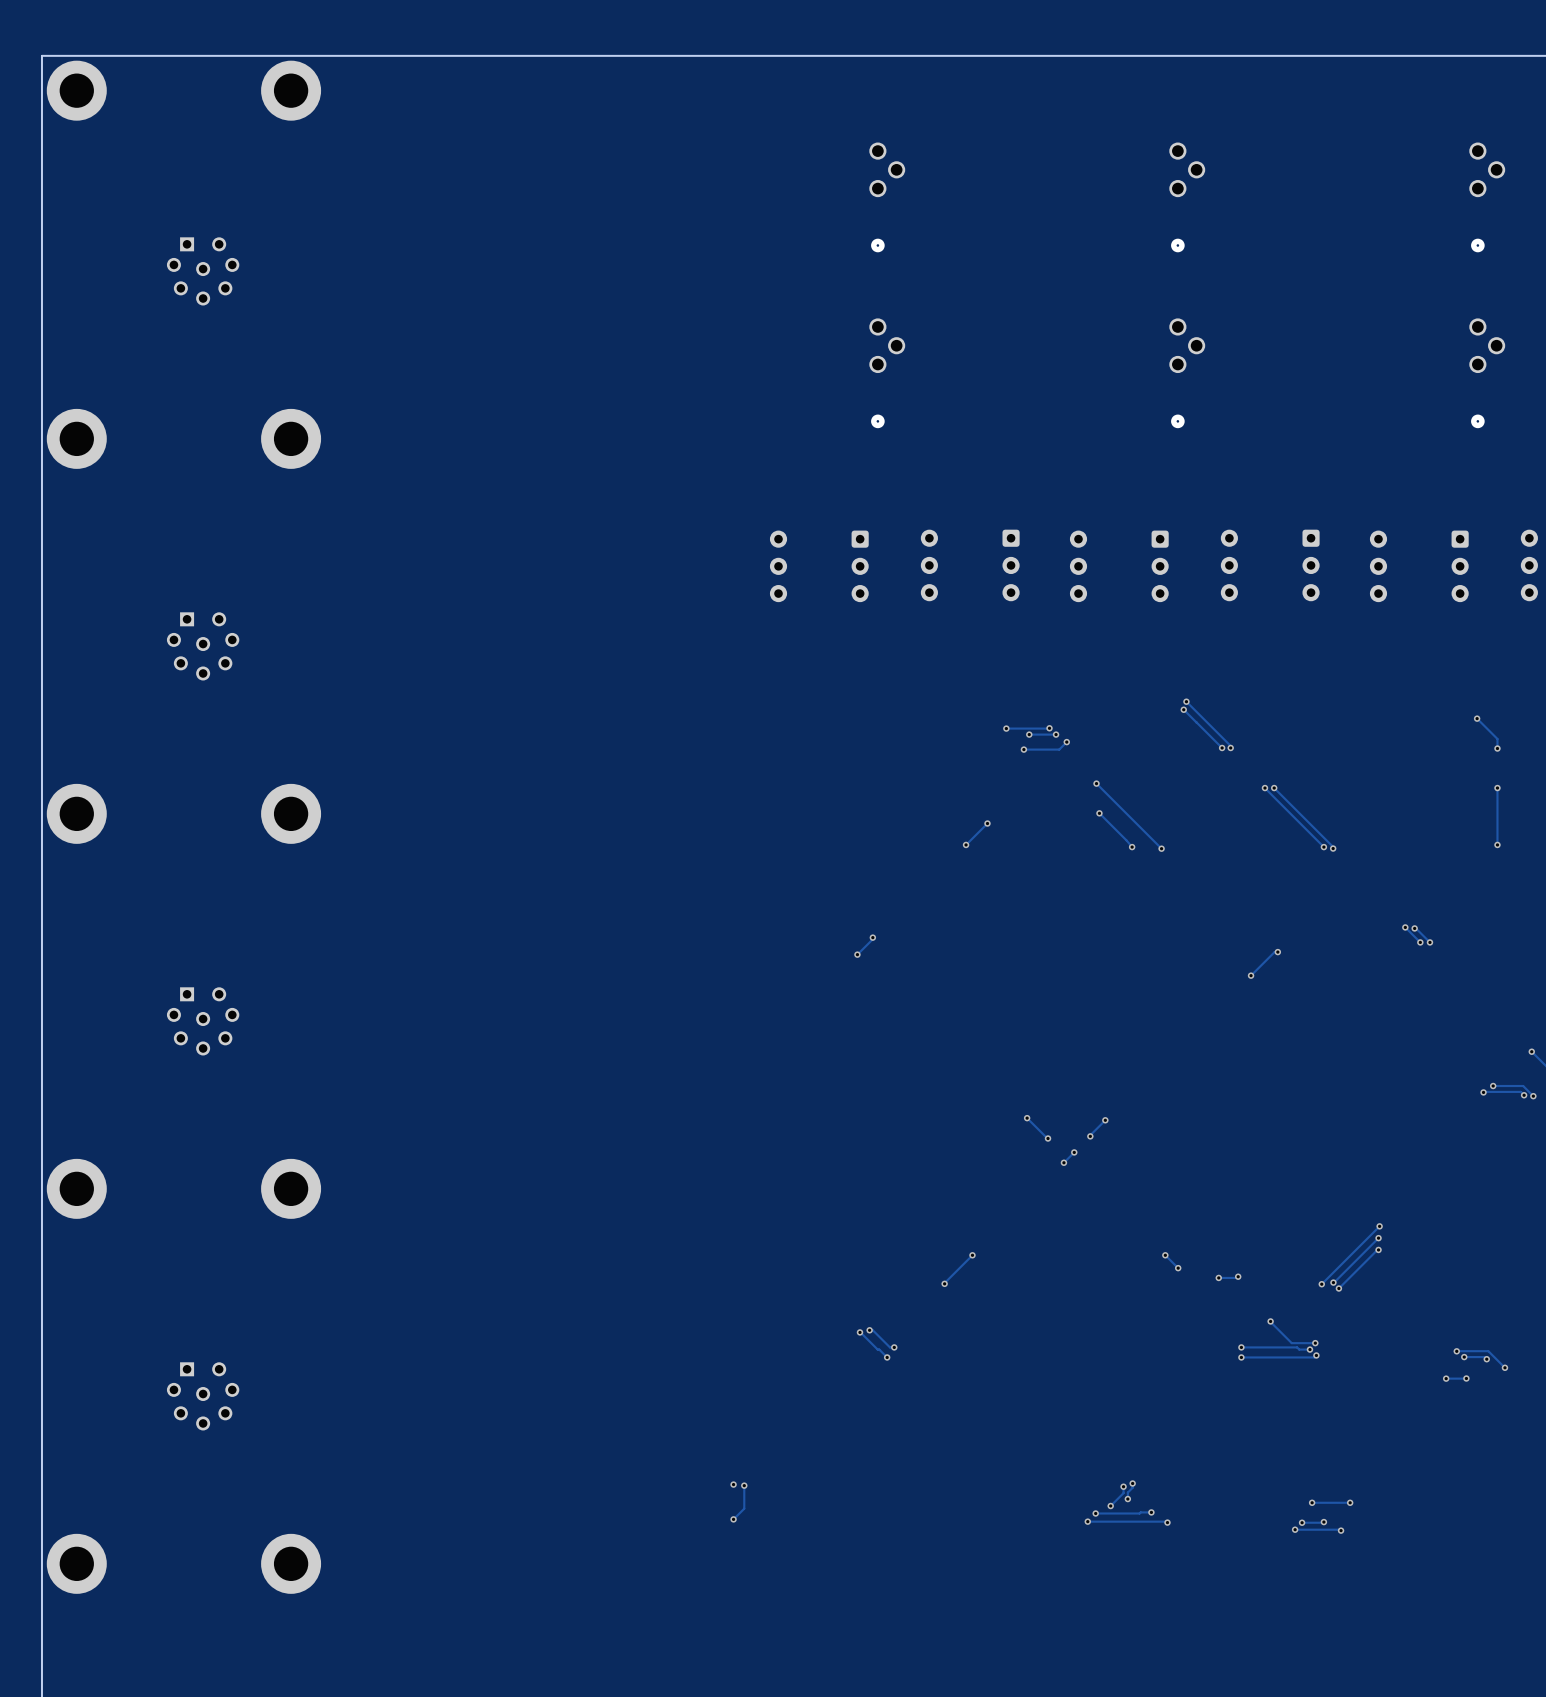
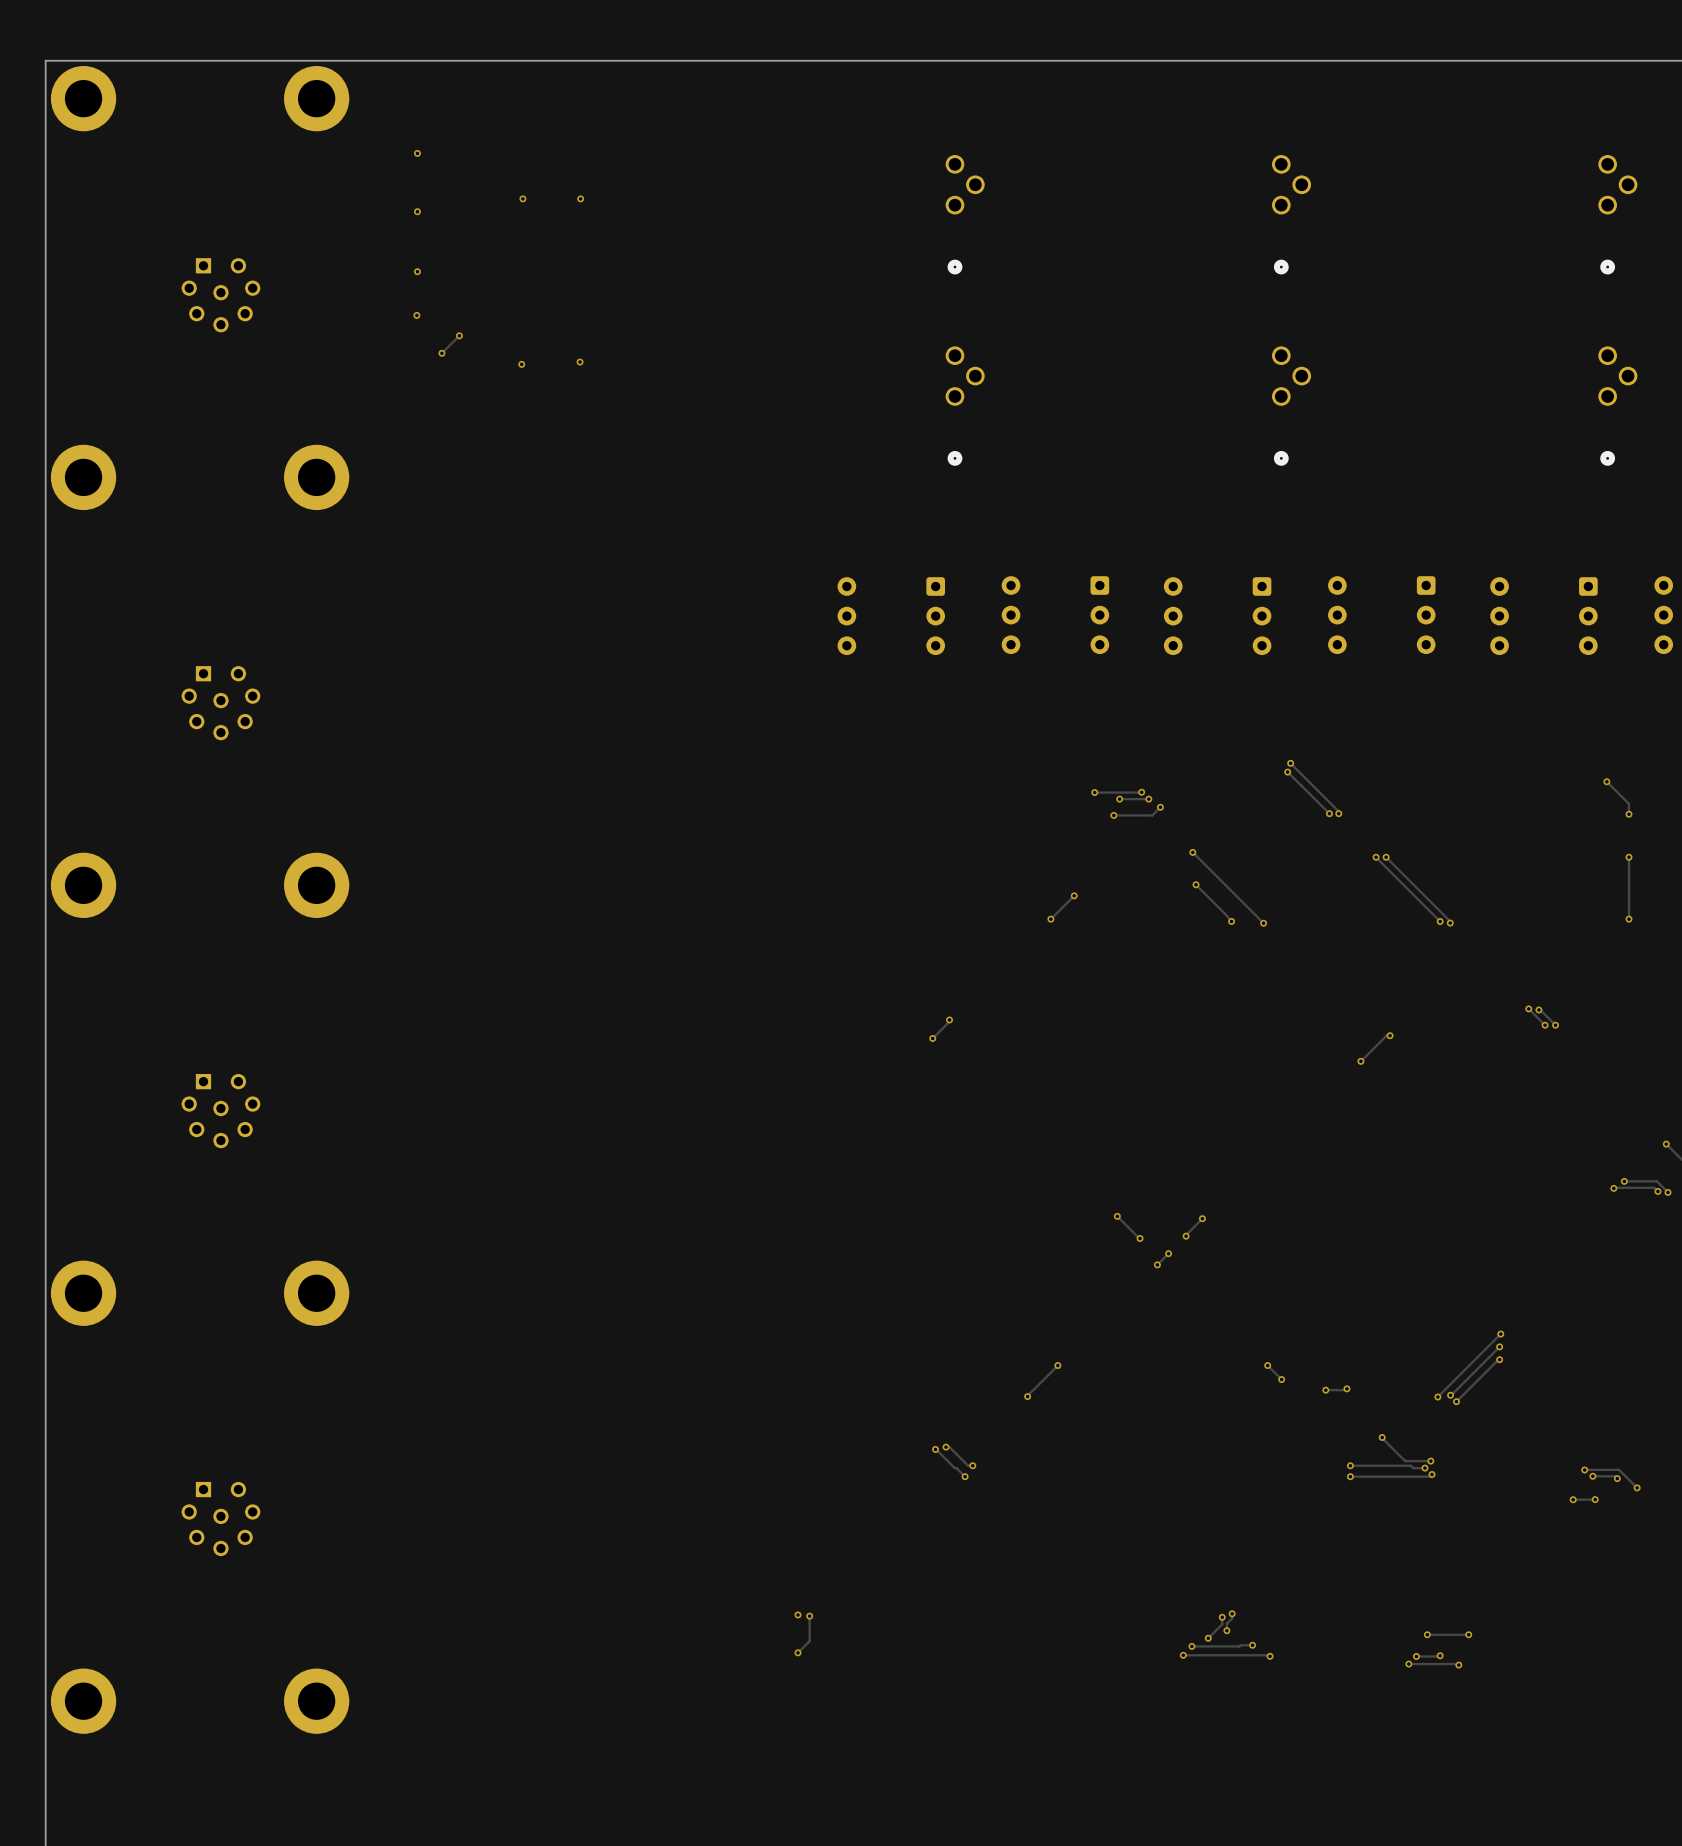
via: none -> (417, 153)
via: none -> (522, 198)
via: none -> (580, 198)
via: none -> (417, 211)
via: none -> (417, 271)
via: none -> (416, 315)
track: none -> (459, 335) (441, 353)
via: none -> (459, 335)
via: none -> (441, 353)
via: none -> (580, 362)
via: none -> (521, 364)

